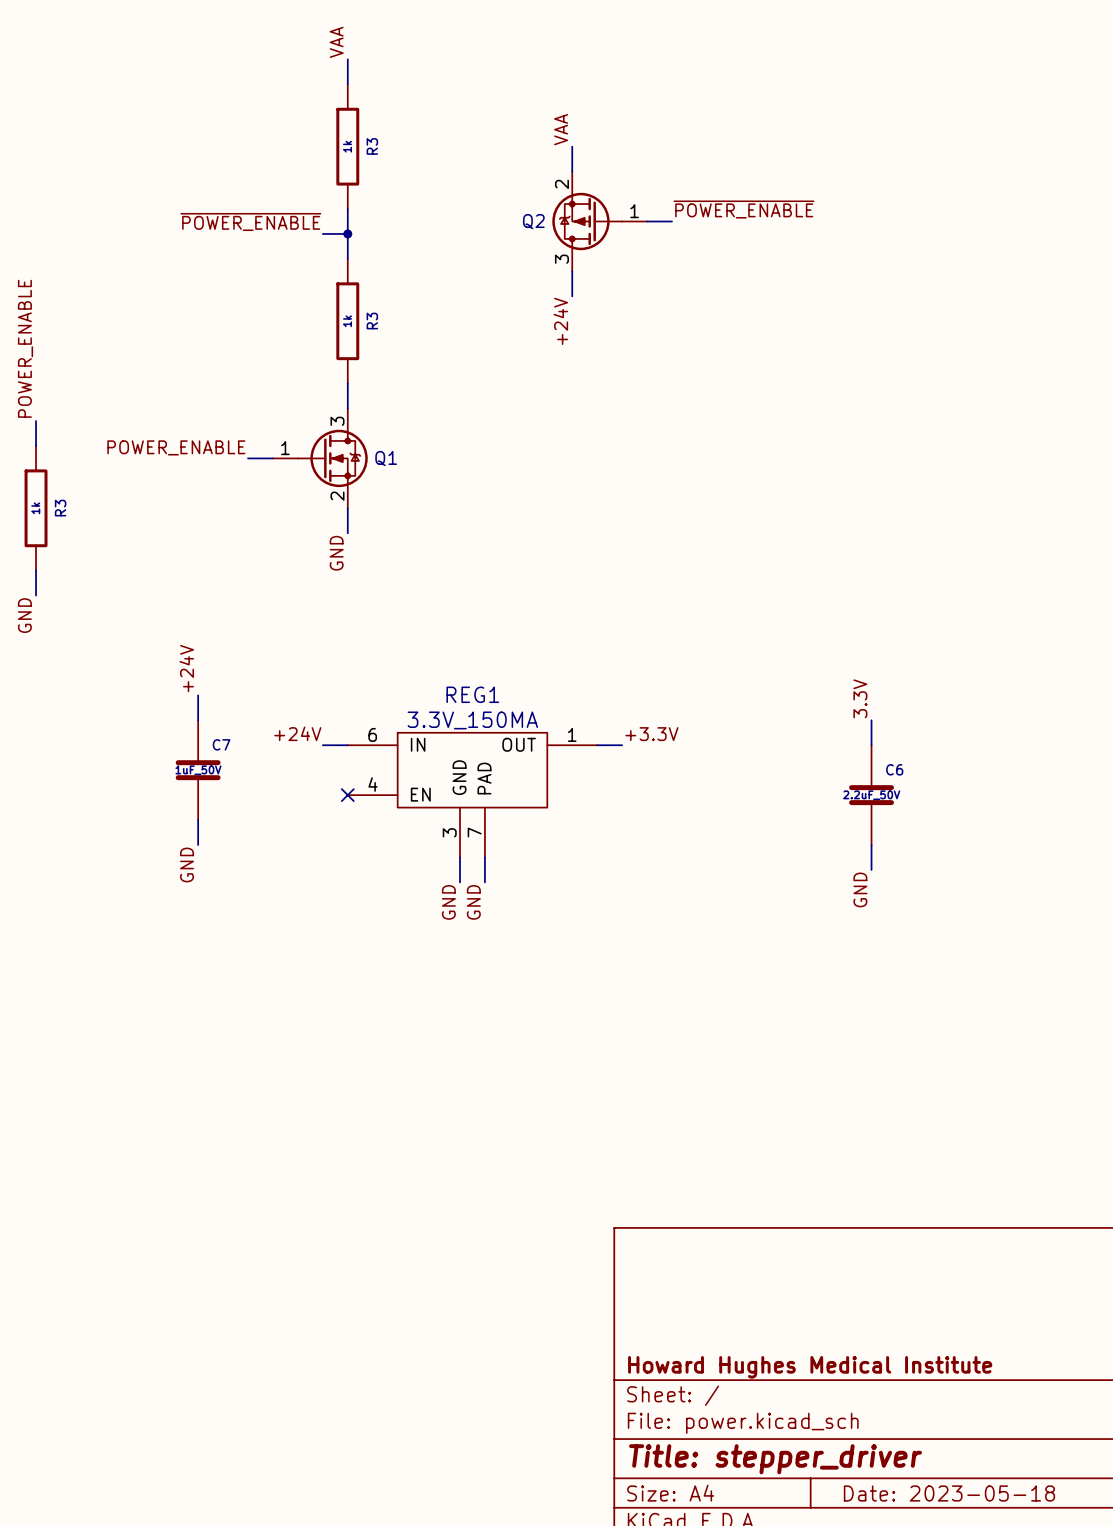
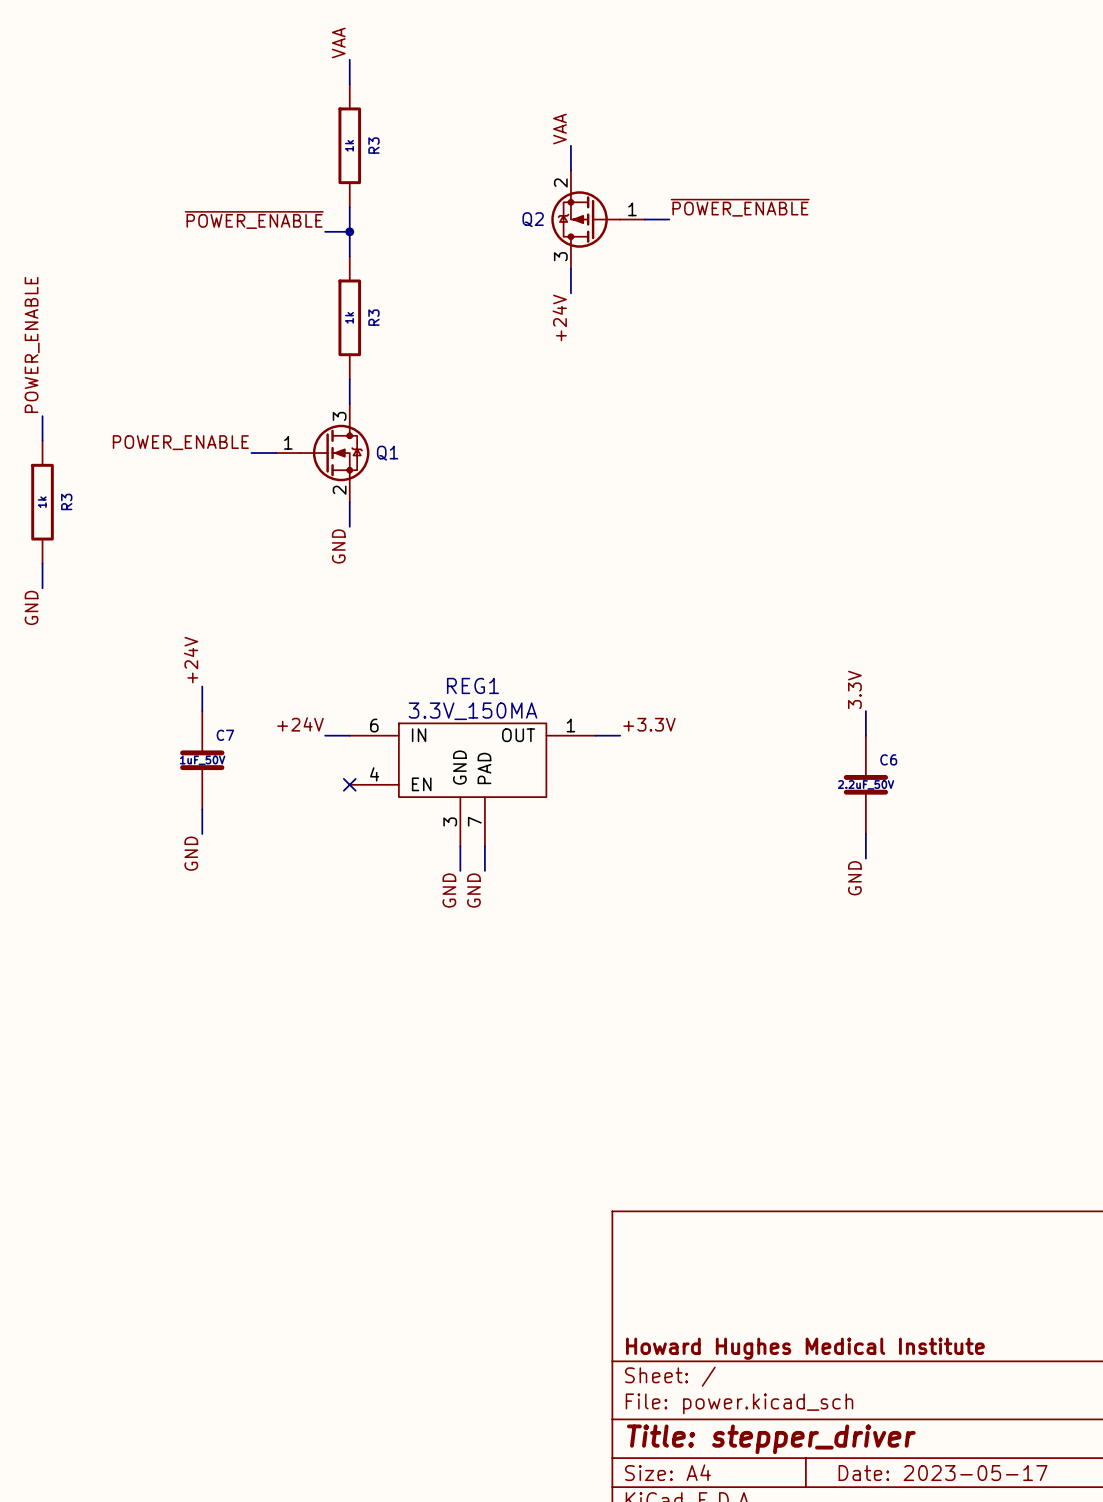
title block: Date: 2023-05-18 (949, 1493) -> Date: 2023-05-17 (943, 1473)

